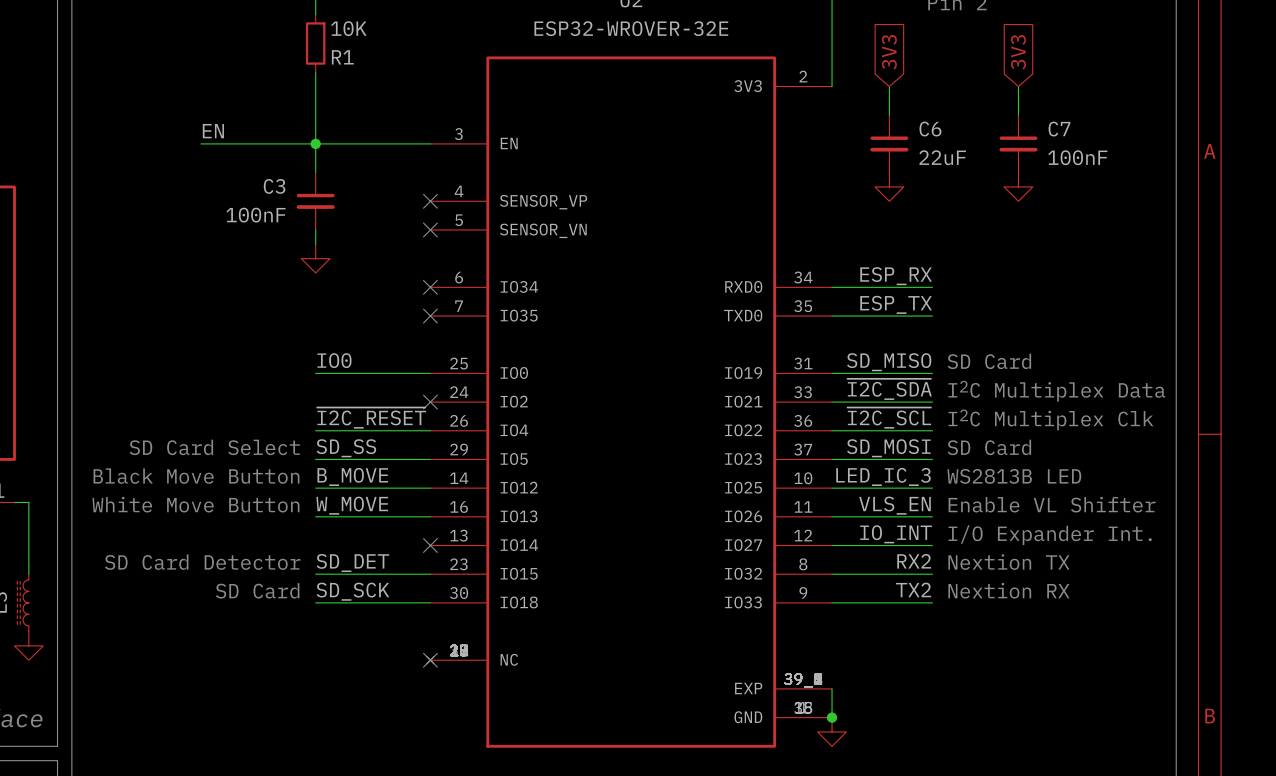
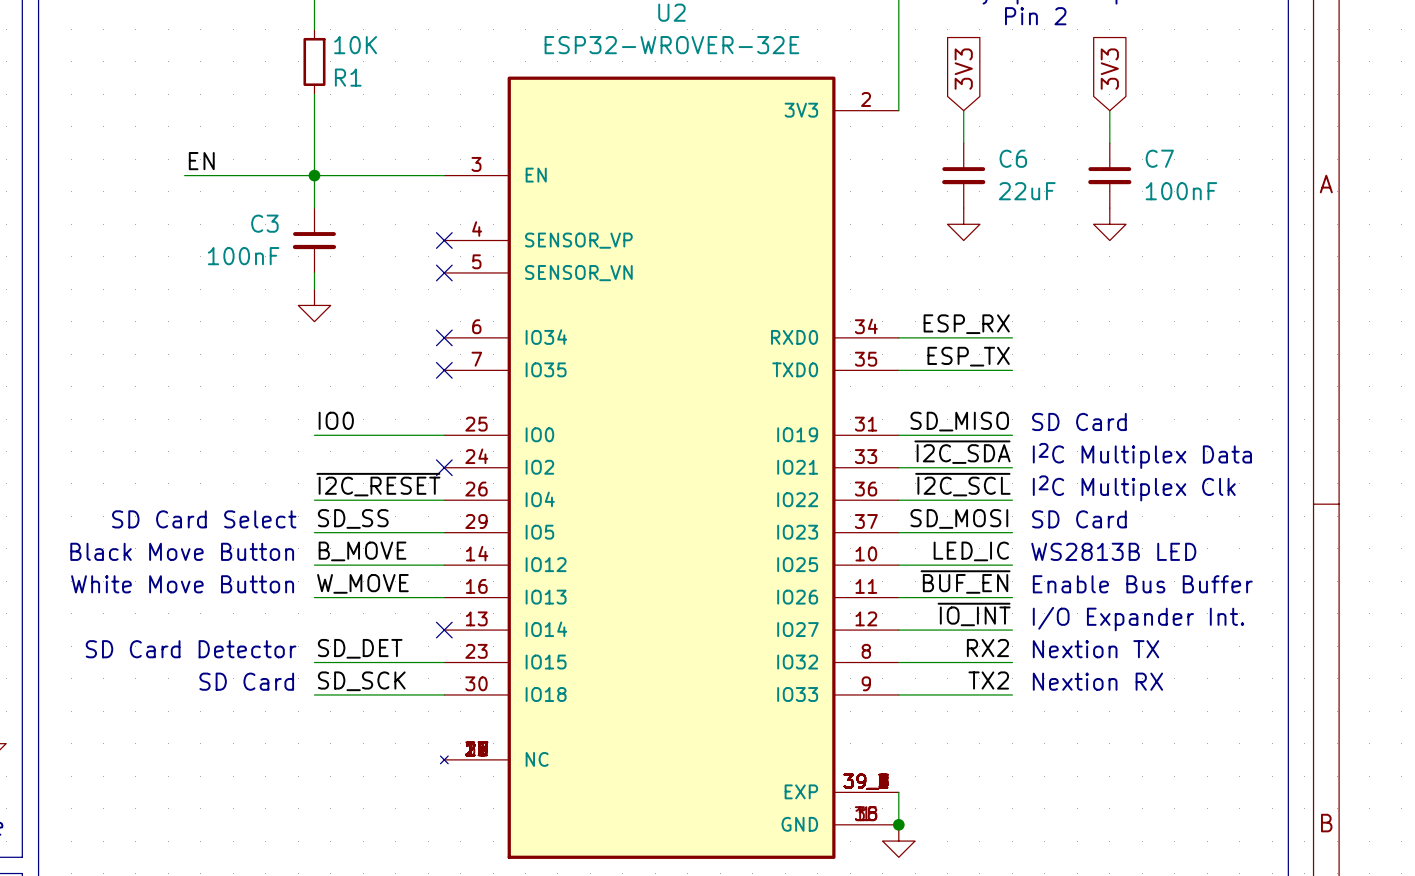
label: LED_IC_3 (883, 476) -> LED_IC (971, 551)
text: Enable VL Shifter (1052, 504) -> Enable Bus Buffer (1142, 584)
label: VLS_EN (894, 505) -> ~{BUF_EN} (965, 582)
label: IO_INT (896, 534) -> ~{IO_INT} (974, 614)
no-connect mark: (430, 660) -> none

